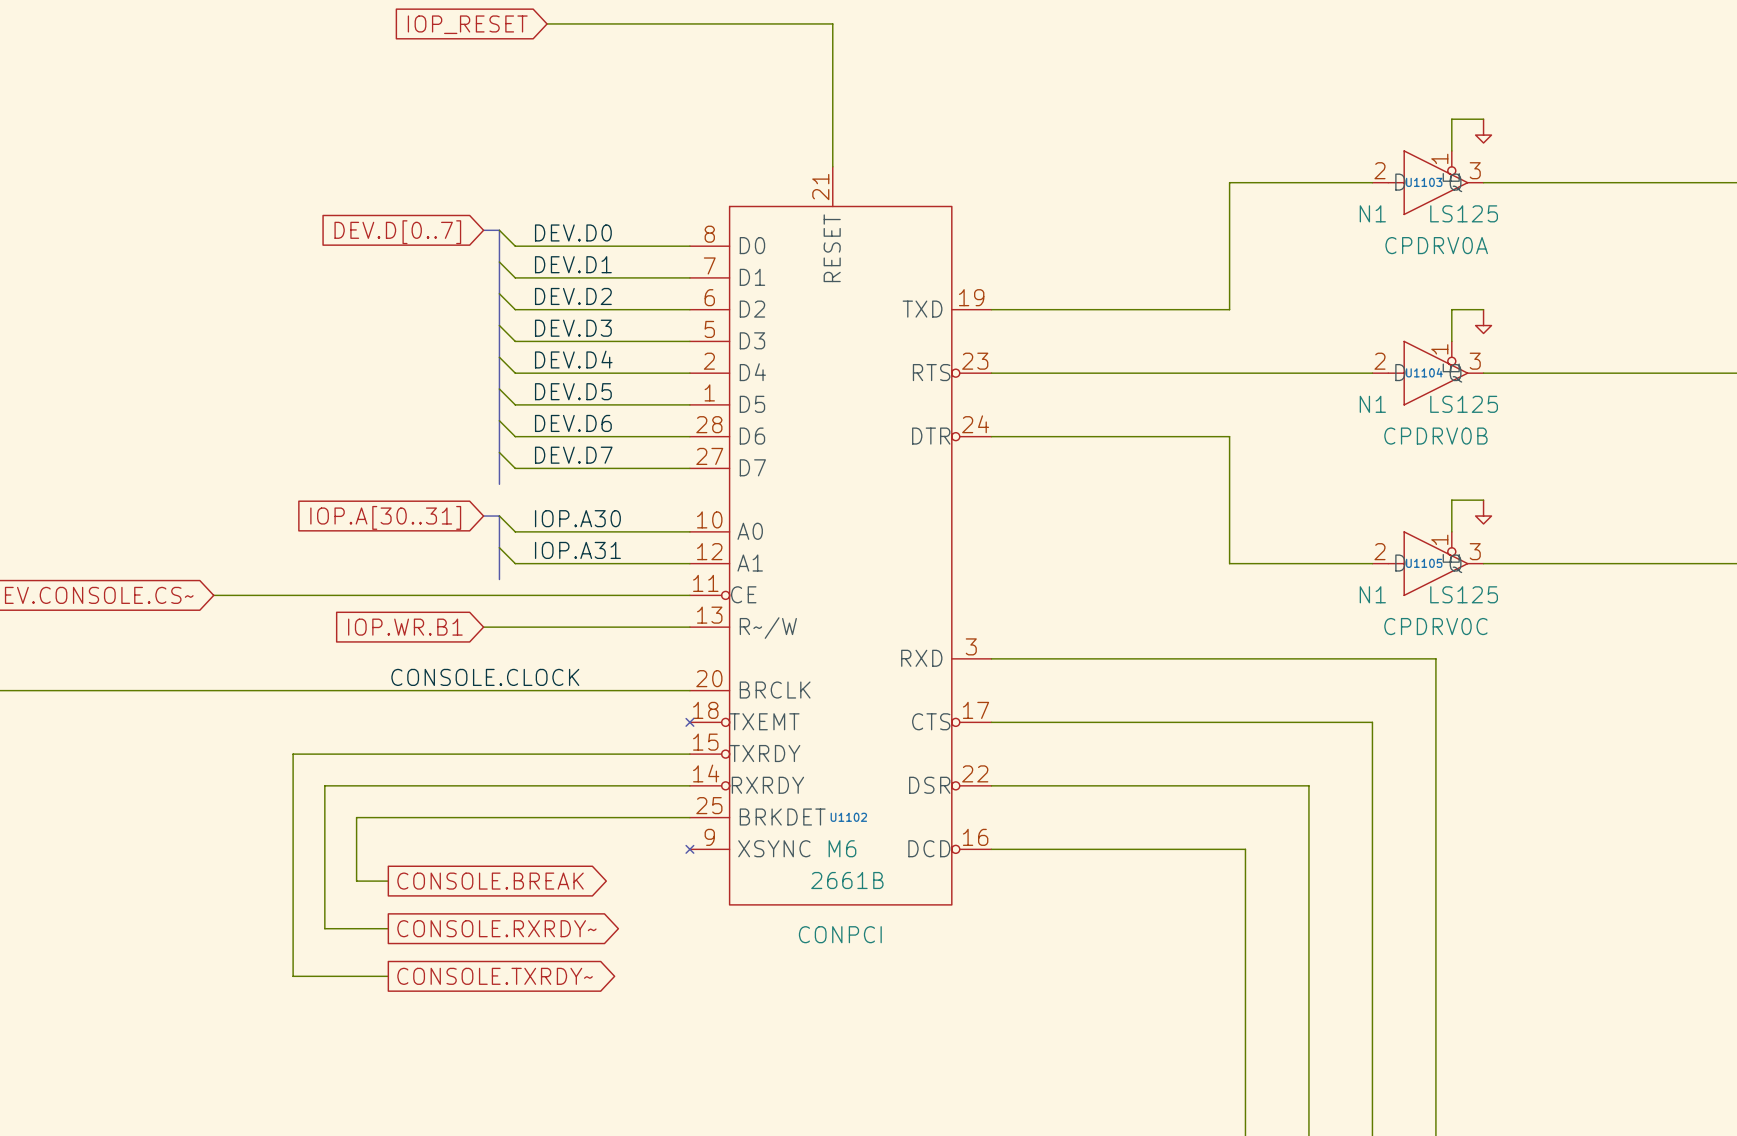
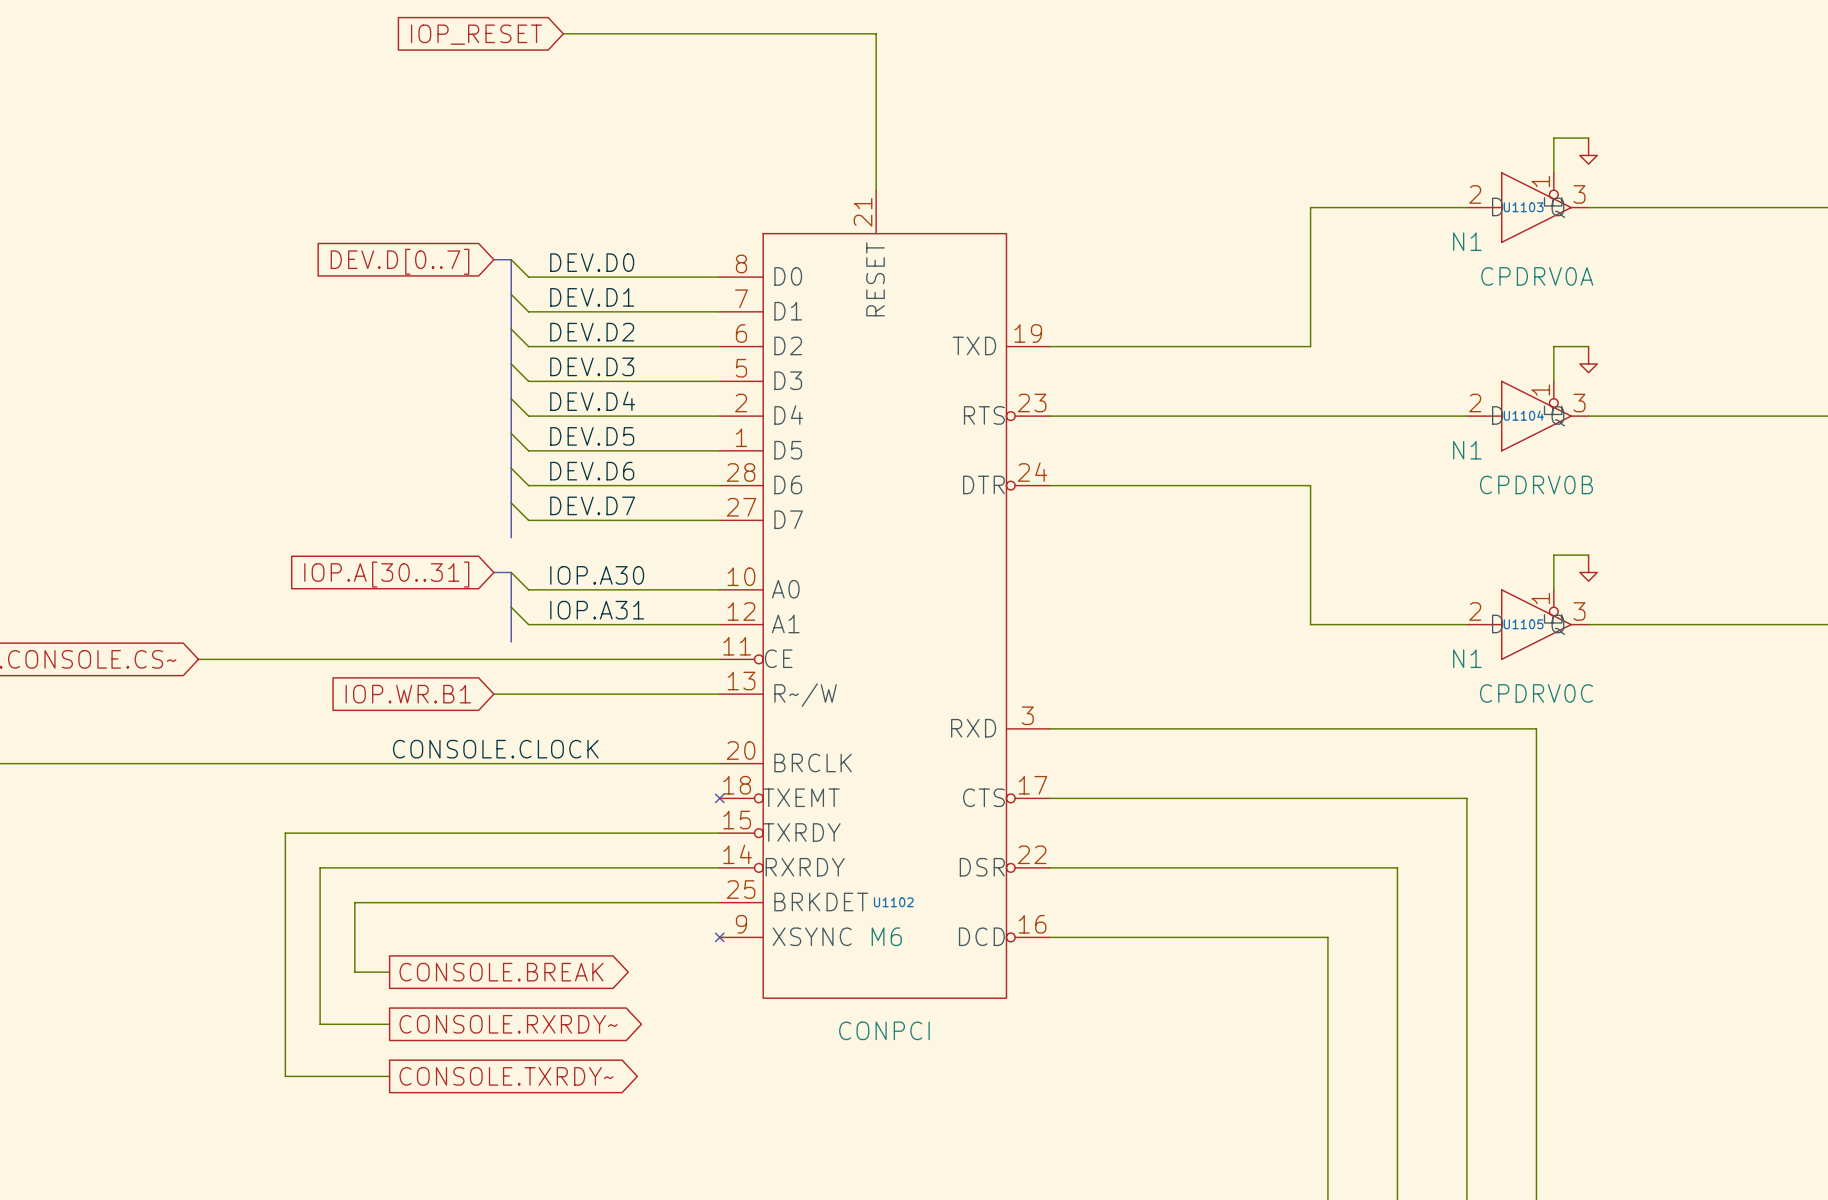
U1103 value: LS125 (1464, 213) -> none
U1104 value: LS125 (1464, 404) -> none
U1105 value: LS125 (1464, 594) -> none
U1102 value: 2661B (847, 880) -> none

